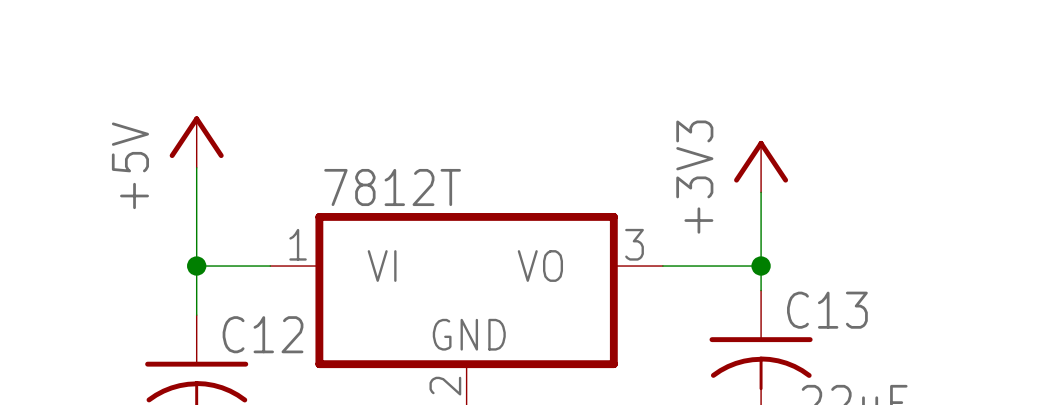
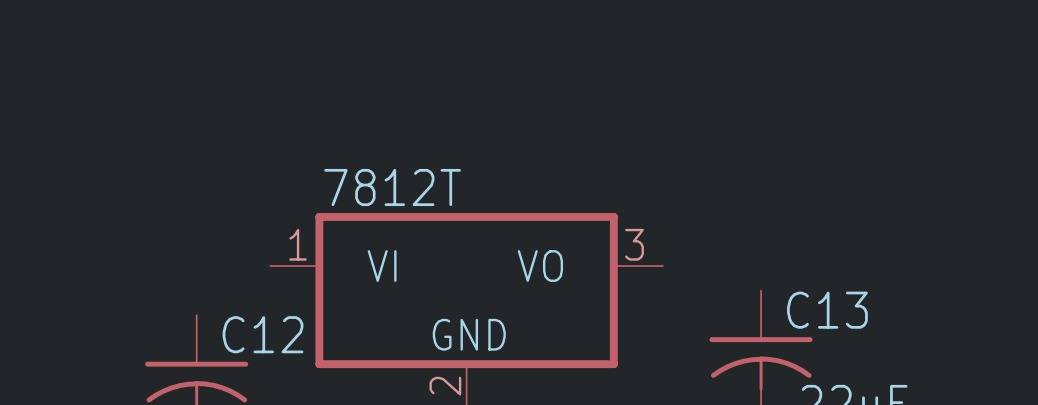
power symbol: +5V (196, 142) -> none
power symbol: +3V3 (761, 166) -> none
wire: (196, 167) (196, 315) -> none
wire: (761, 192) (761, 290) -> none
wire: (196, 266) (270, 266) -> none
junction: (196, 266) -> none
wire: (662, 266) (761, 266) -> none
junction: (761, 266) -> none

